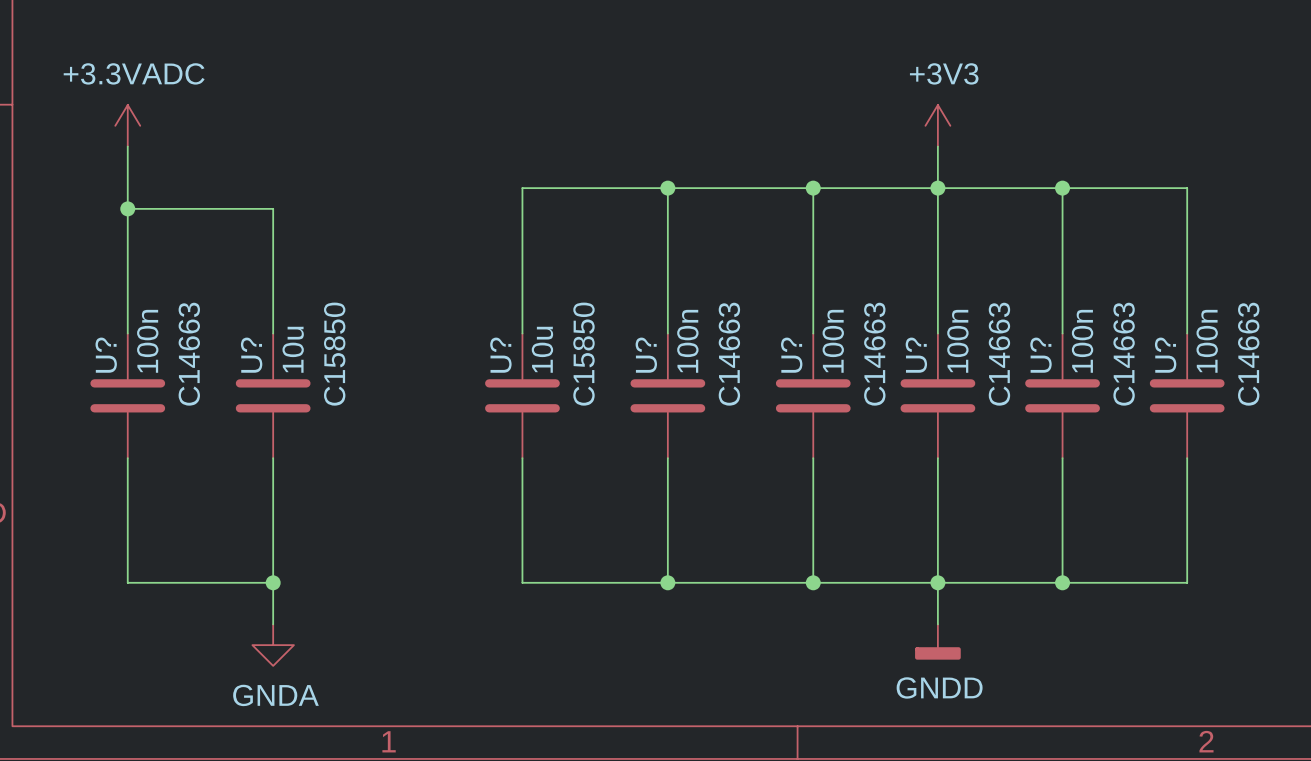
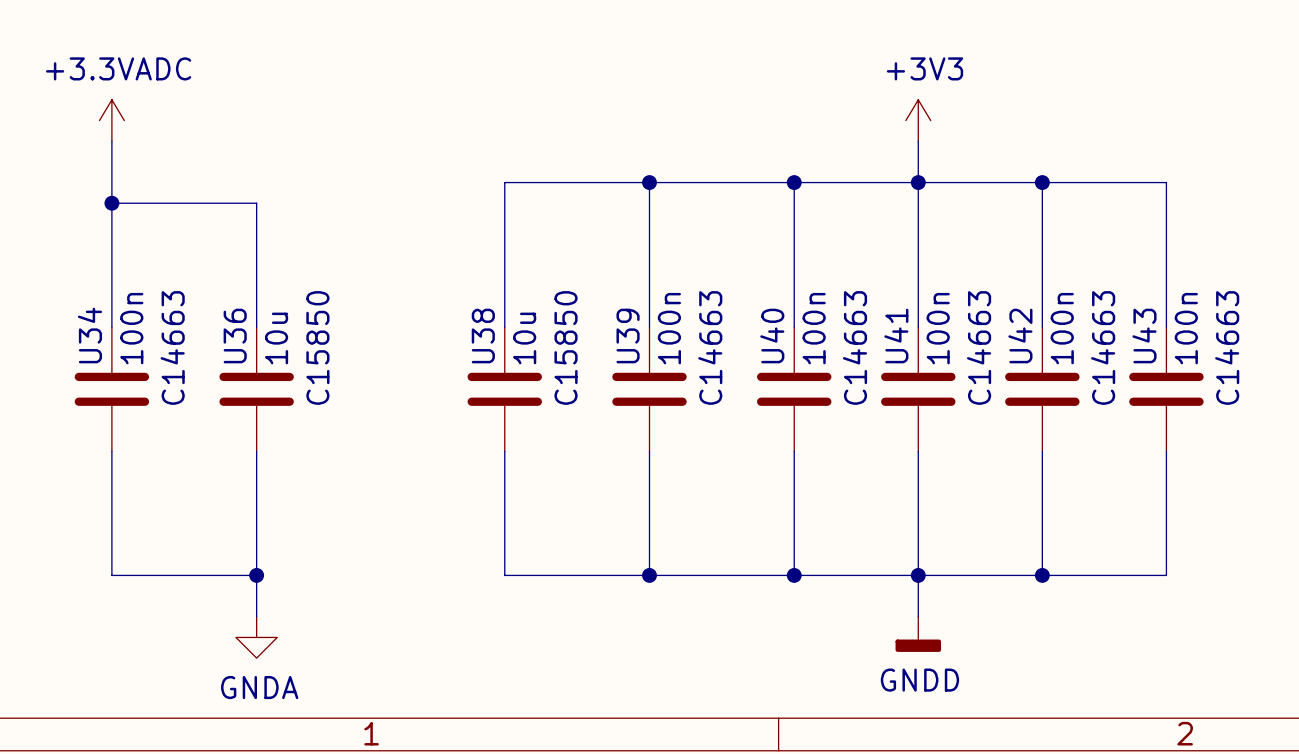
U? name: U? (106, 355) -> U34 (89, 335)
U? name: U? (251, 355) -> U36 (235, 336)
U? name: U? (500, 355) -> U38 (483, 336)
U? name: U? (646, 355) -> U39 (628, 336)
U? name: U? (791, 355) -> U40 (772, 336)
U? name: U? (916, 355) -> U41 (896, 336)
U? name: U? (1040, 355) -> U42 (1020, 336)
U? name: U? (1165, 355) -> U43 (1144, 336)

